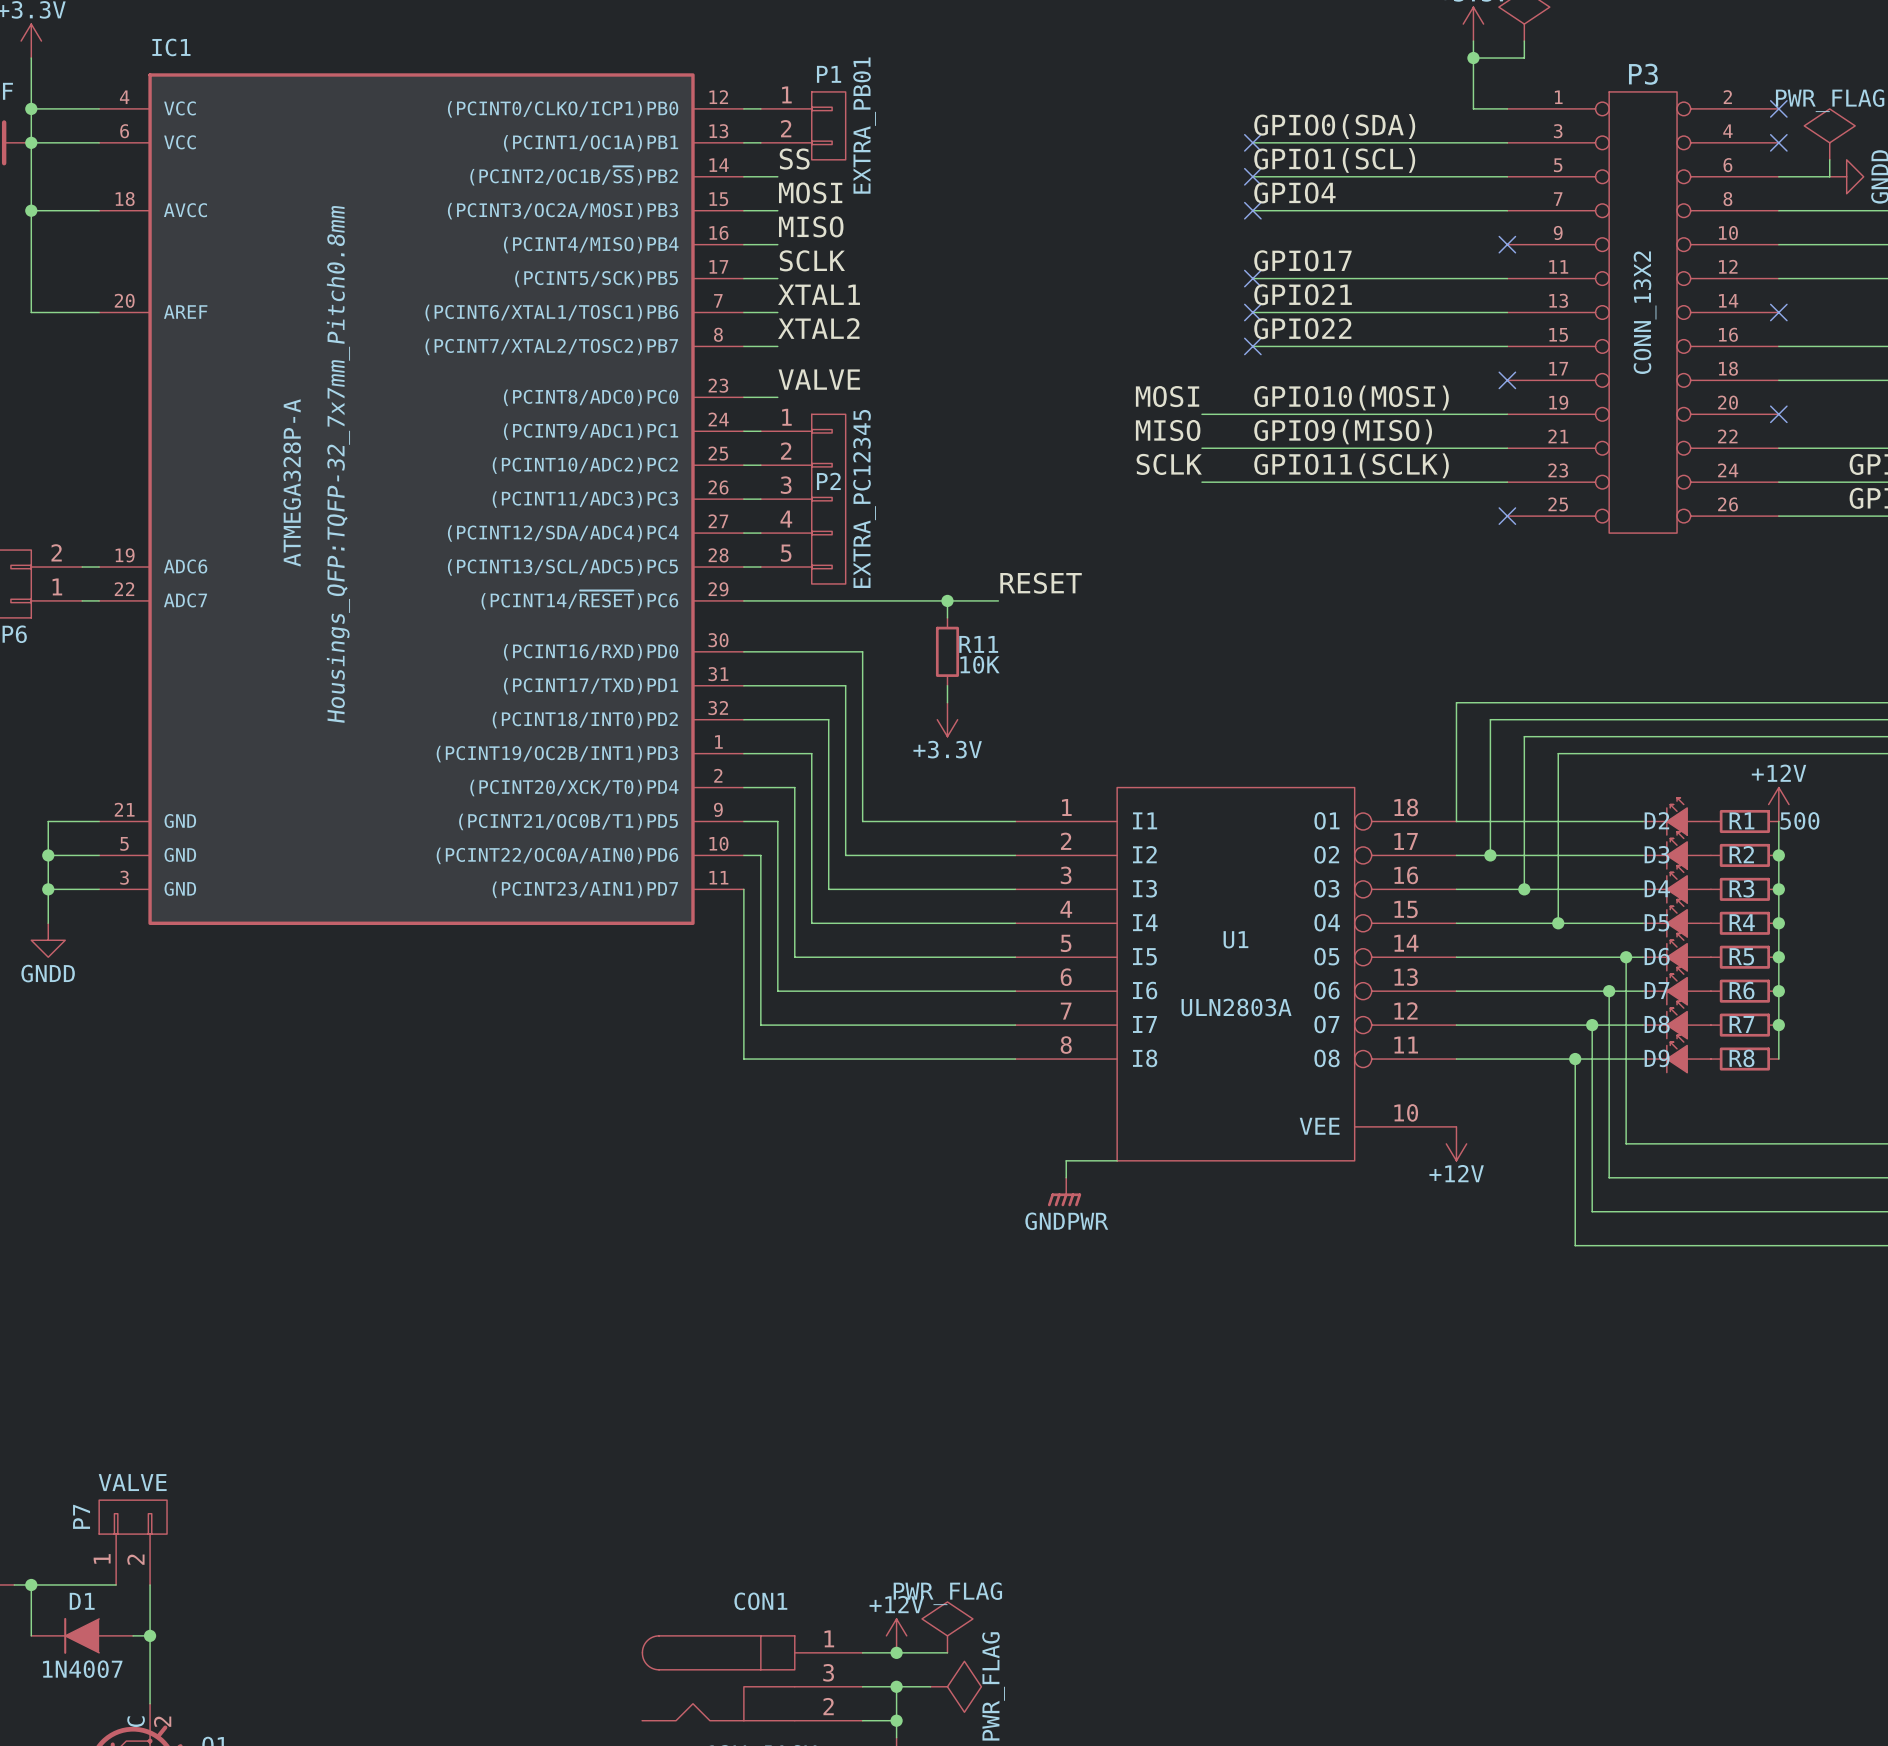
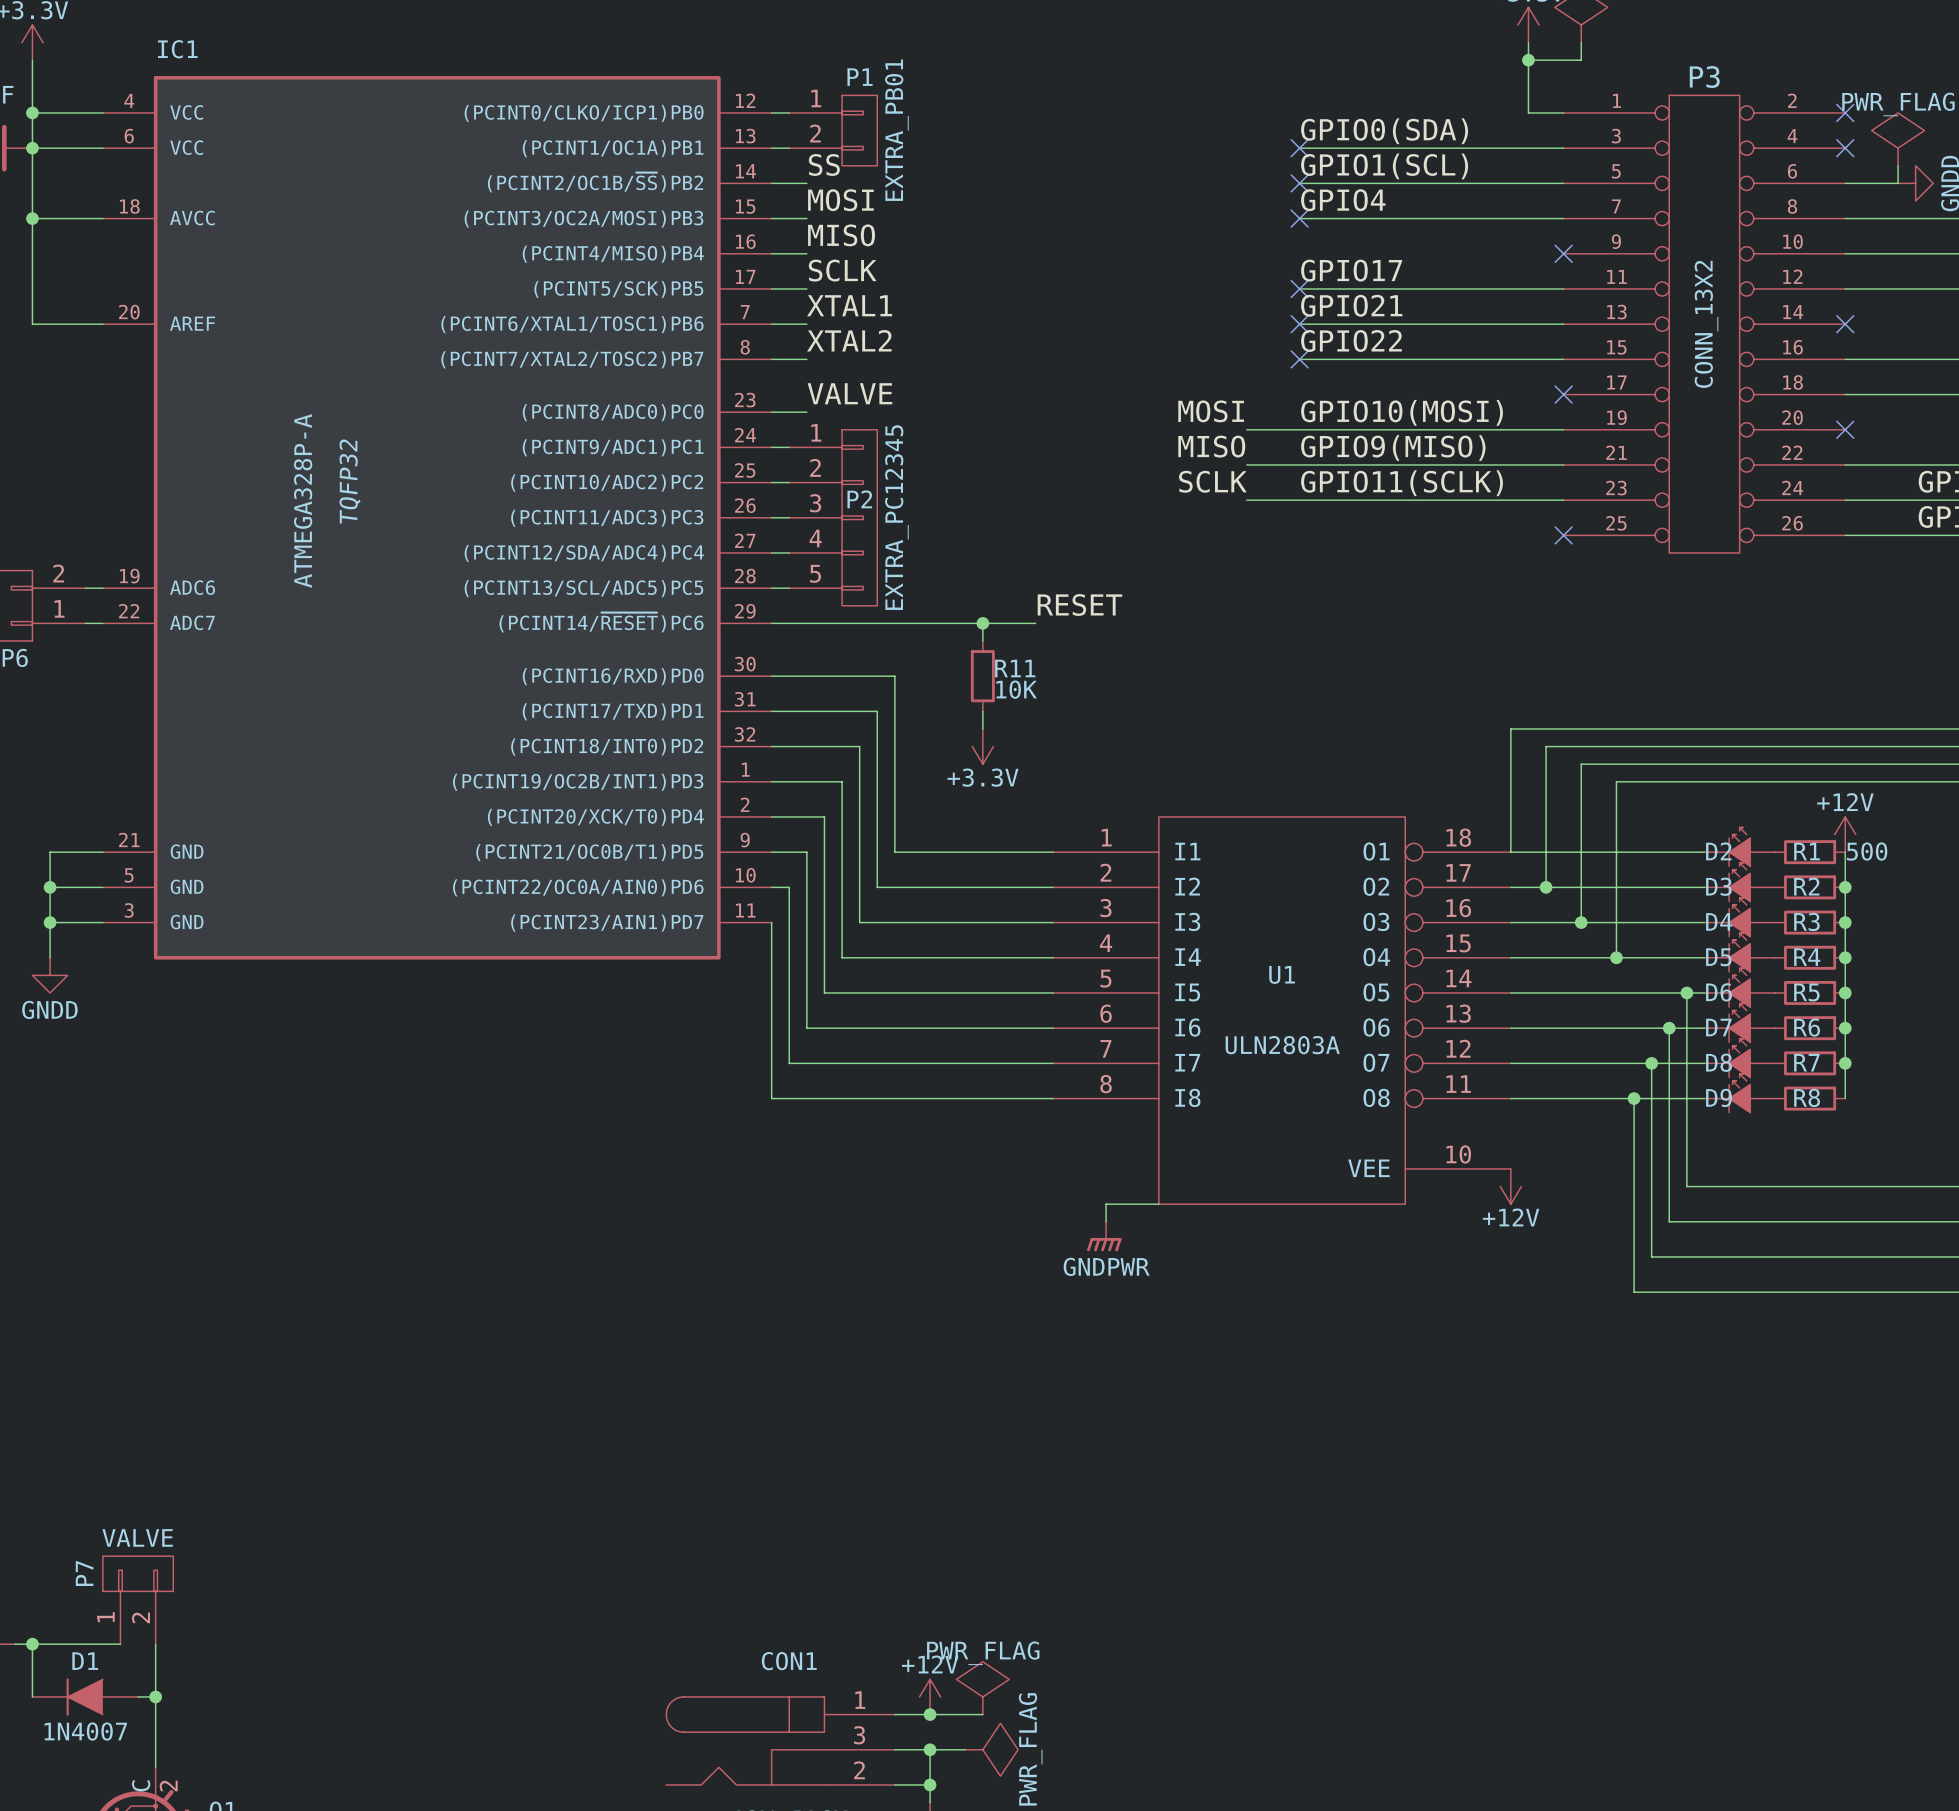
IC1 text: Housings_QFP:TQFP-32_7x7mm_Pitch0.8mm (338, 464) -> TQFP32 (350, 481)

